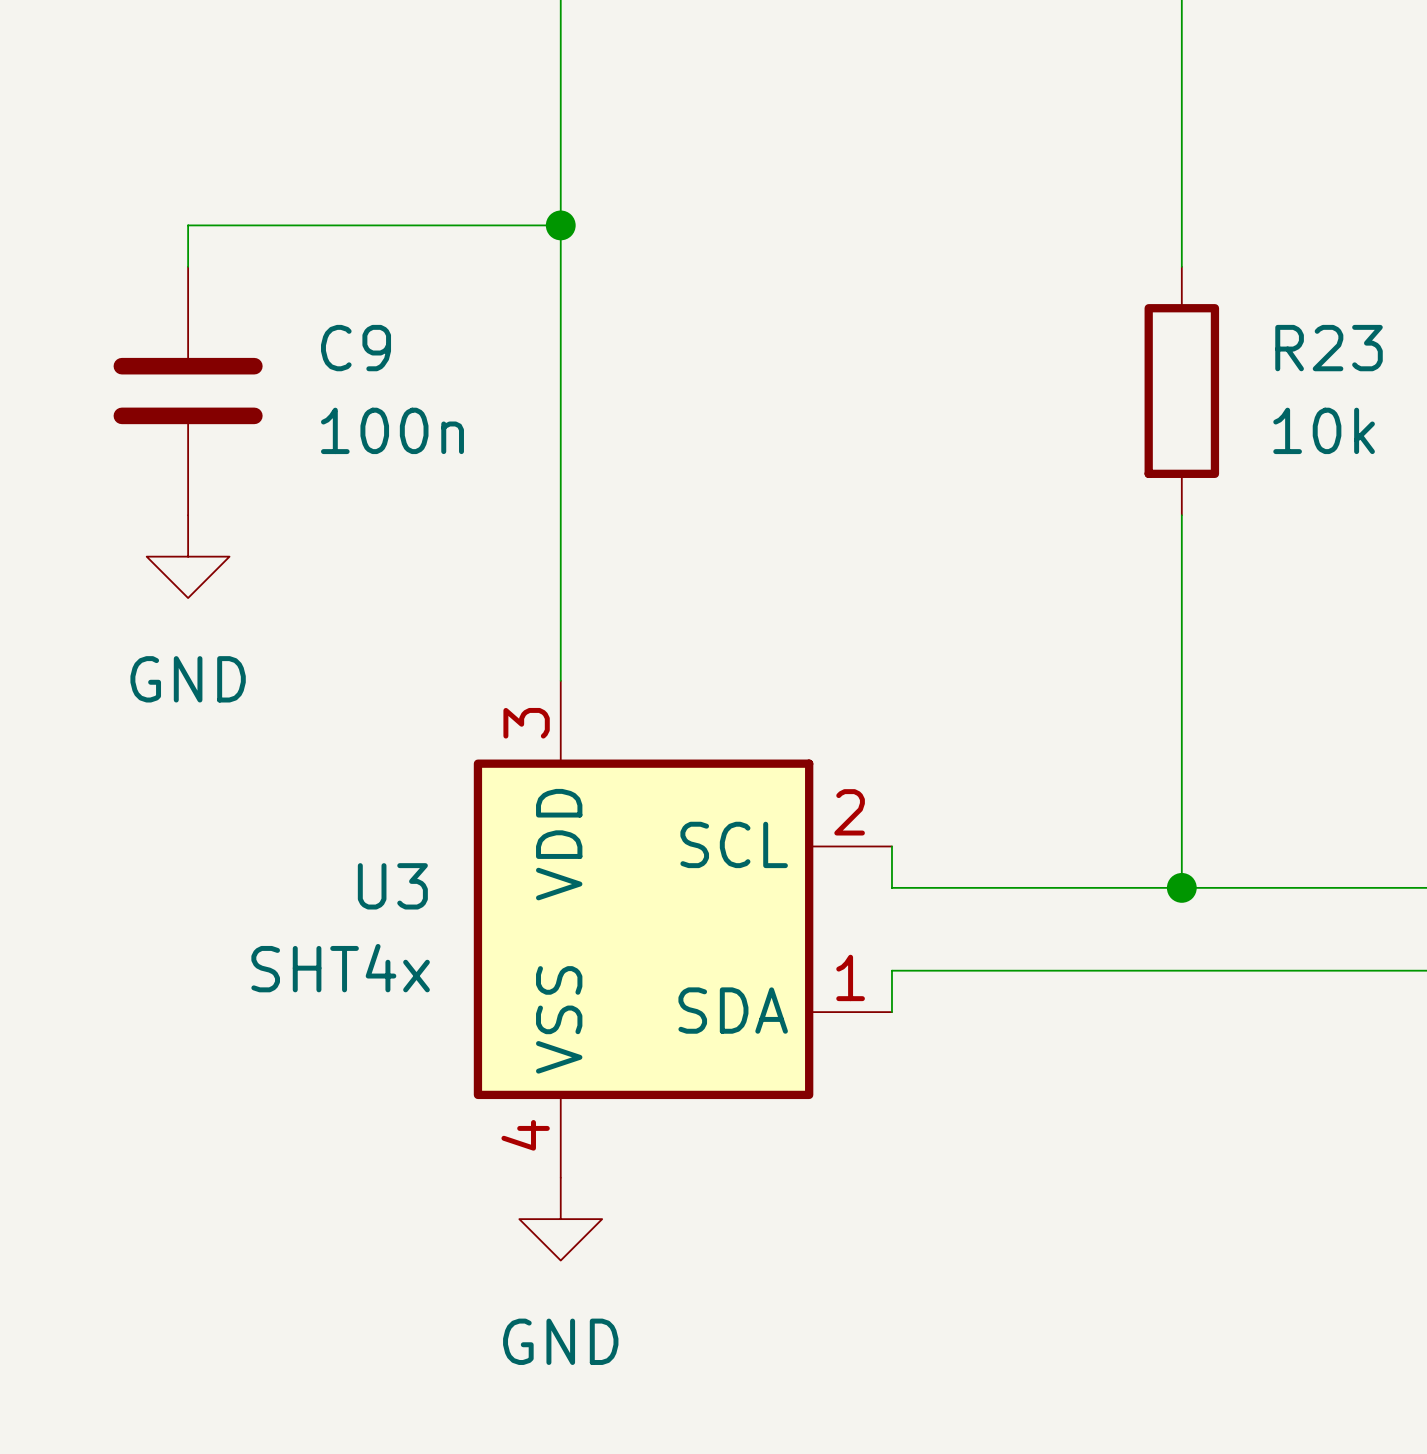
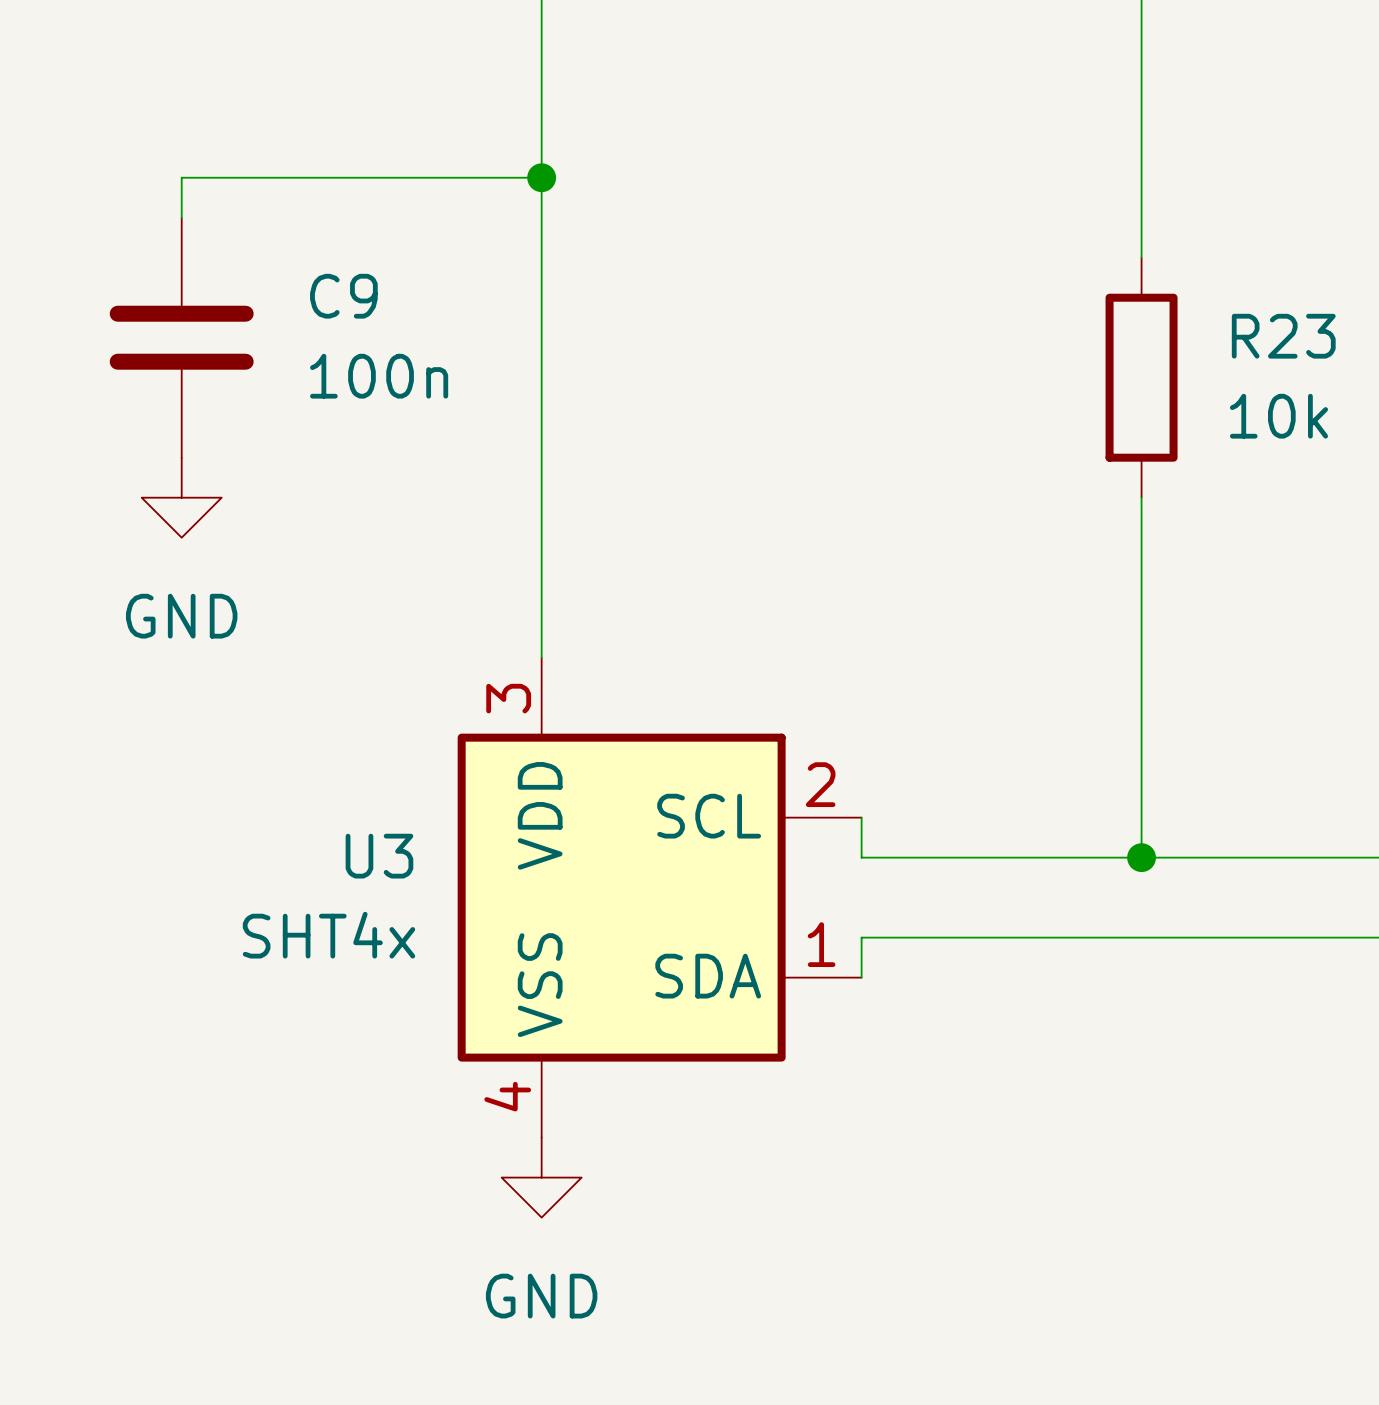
wire: (560, 225) (188, 225) (188, 266) -> (541, 177) (181, 177) (181, 217)
junction position: (560, 225) -> (541, 177)
C9 position: (188, 391) -> (181, 337)
power symbol position: GND (188, 556) -> GND (181, 497)

